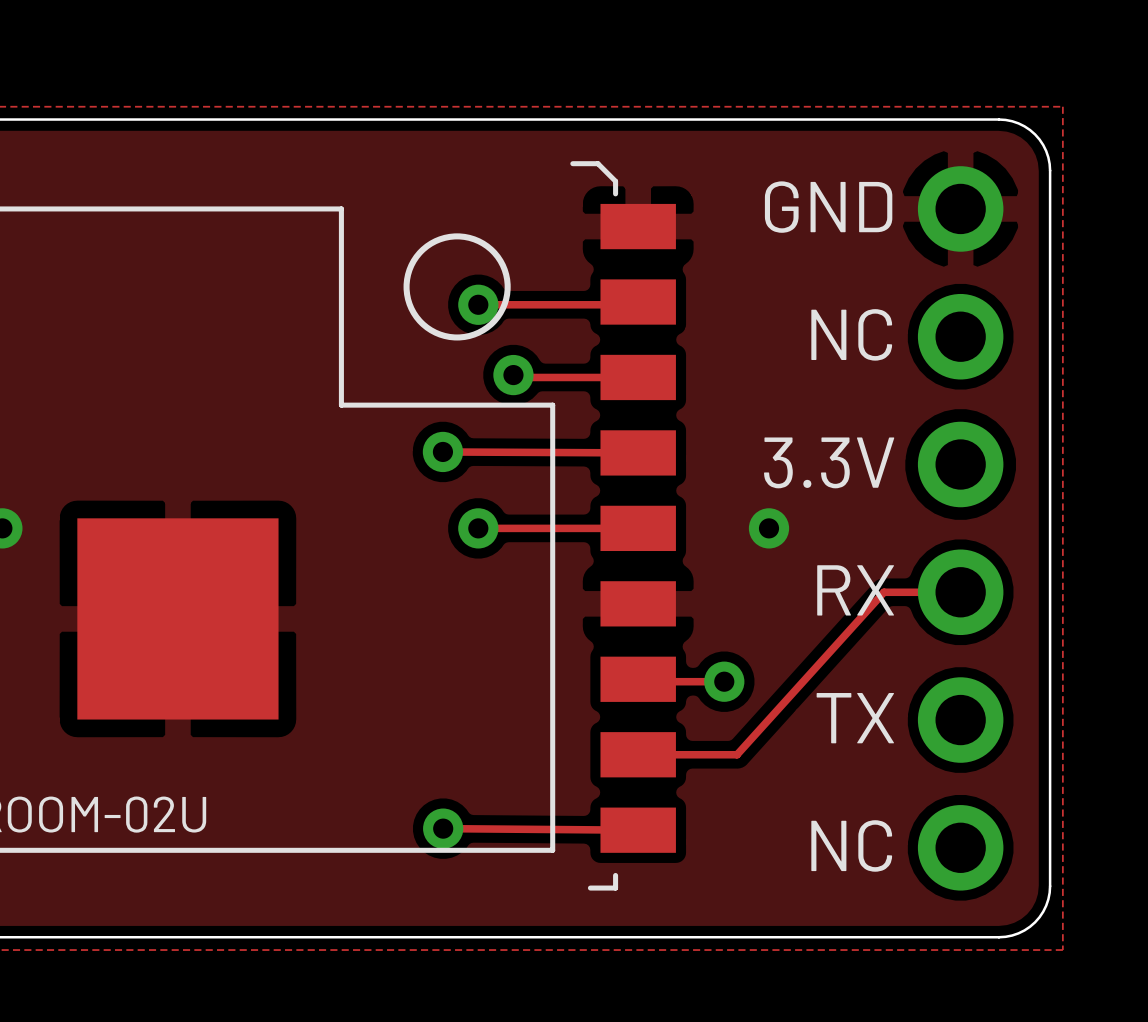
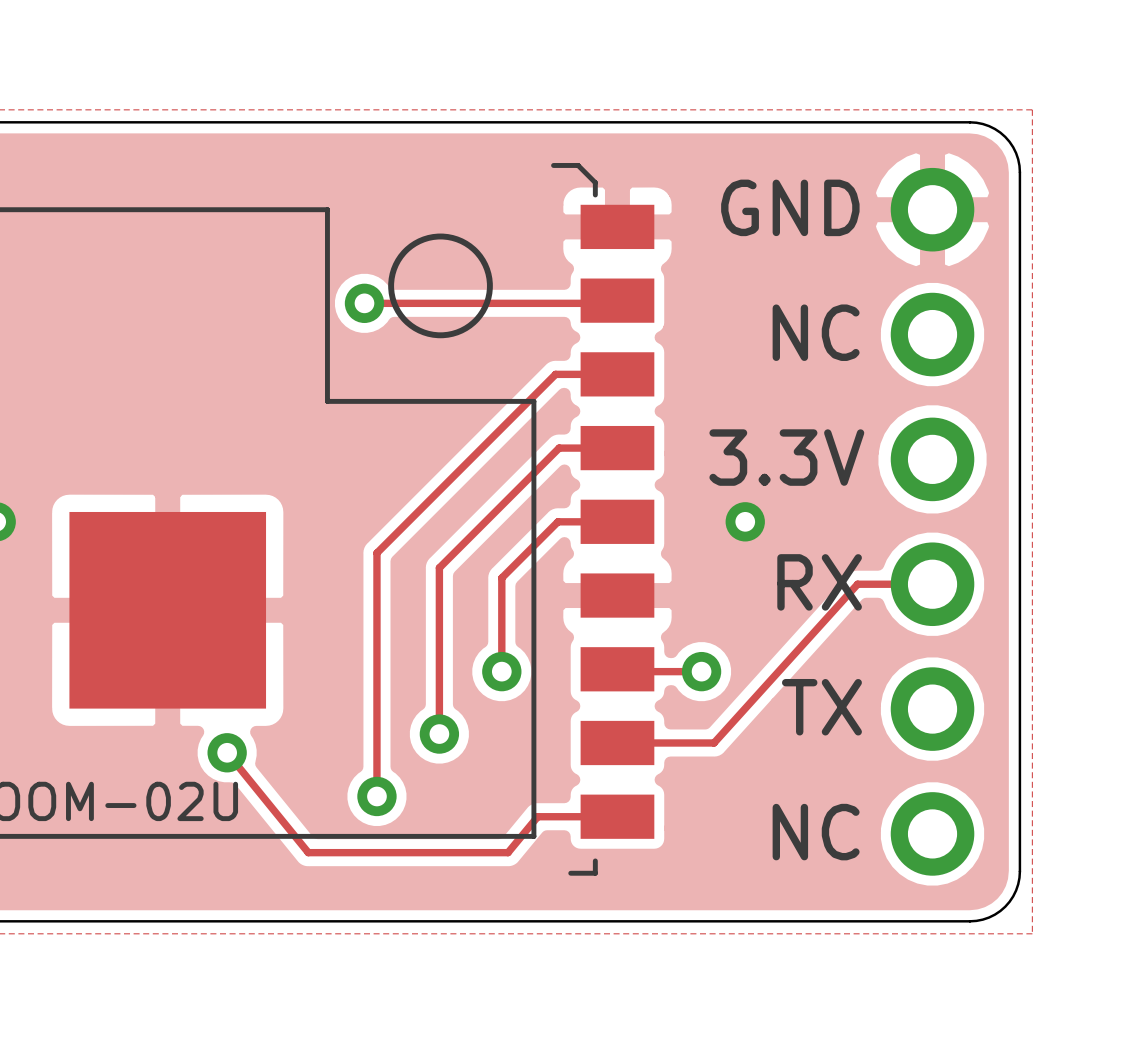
track: none -> (364, 303) (461, 303)
via: none -> (364, 303)
via: (478, 304) -> none
track: (513, 375) (515, 377) (574, 377) -> (376, 796) (376, 553) (555, 374)
via: (513, 375) -> none
track: (442, 451) (638, 452) -> (439, 734) (439, 567) (559, 448) (617, 448)
via: (442, 451) -> none
track: (478, 528) (577, 528) -> (501, 671) (501, 578) (557, 521)
via: (478, 528) -> none
via: none -> (501, 671)
via: none -> (439, 734)
track: none -> (227, 752) (308, 852) (508, 852) (537, 816) (617, 816)
via: none -> (227, 752)
via: none -> (376, 796)
track: (443, 828) (638, 830) (636, 828) -> none
via: (443, 828) -> none

